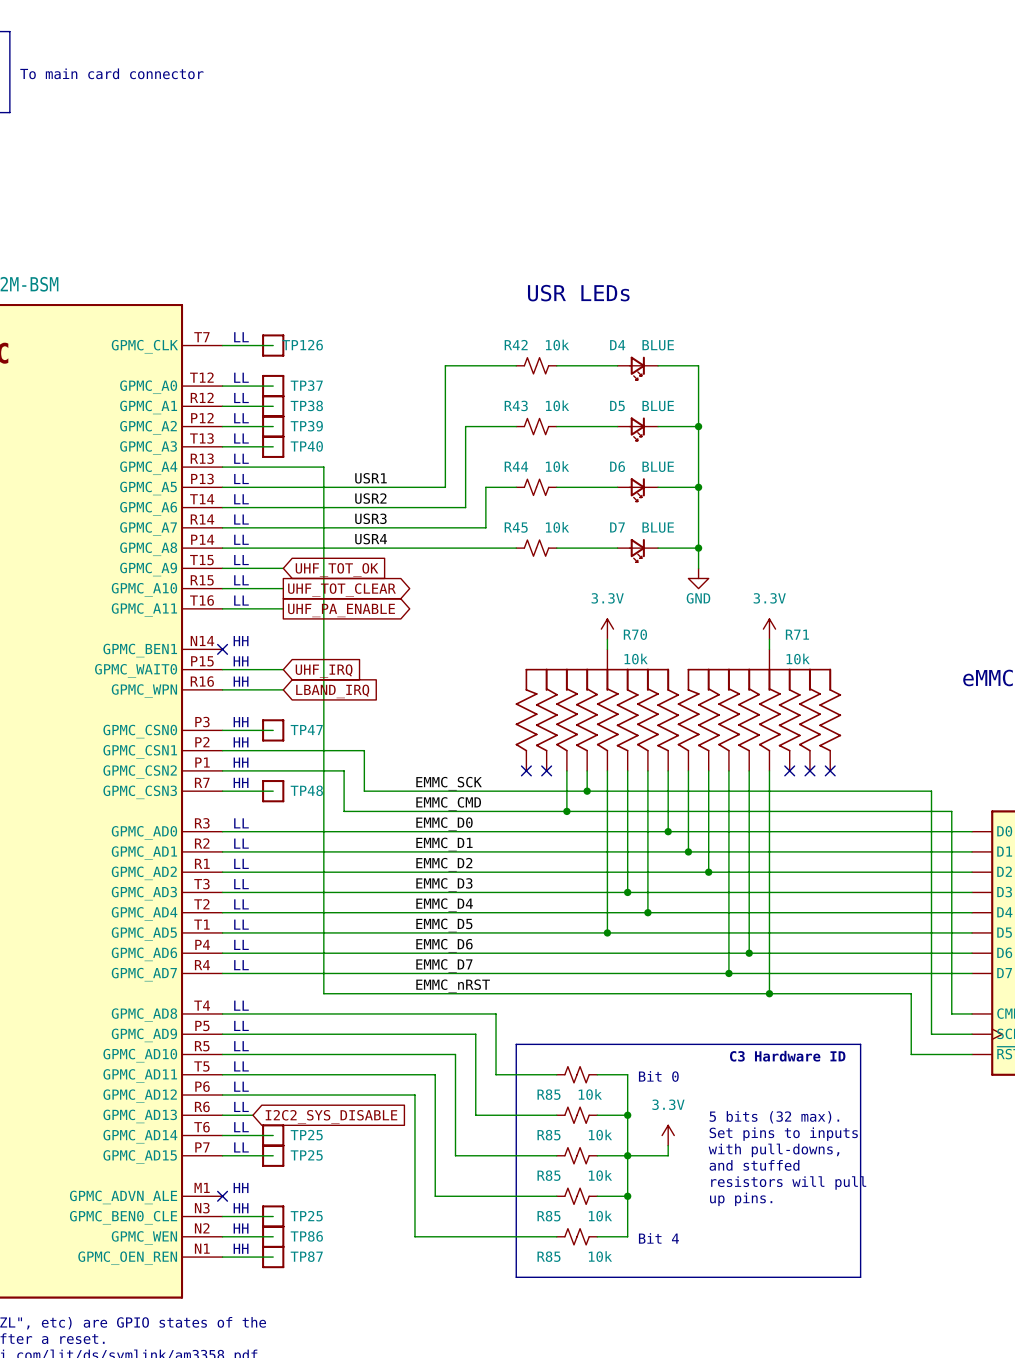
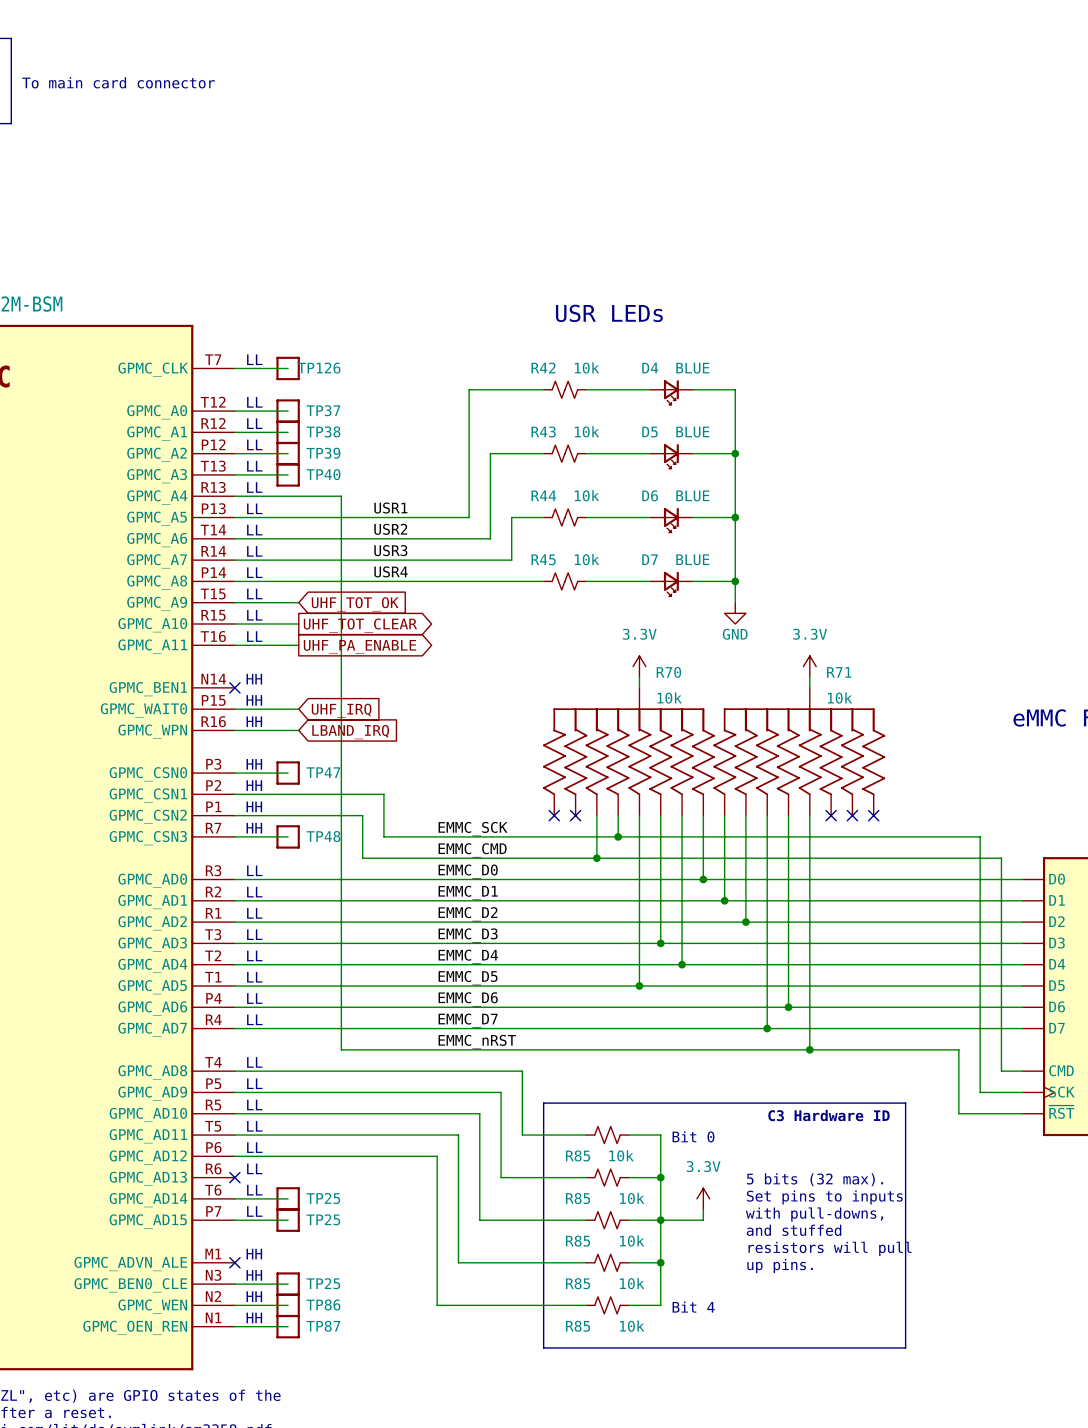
wire: (222, 1115) (252, 1115) -> none
no-connect mark: none -> (234, 1177)
global label: I2C2_SYS_DISABLE (331, 1116) -> none

